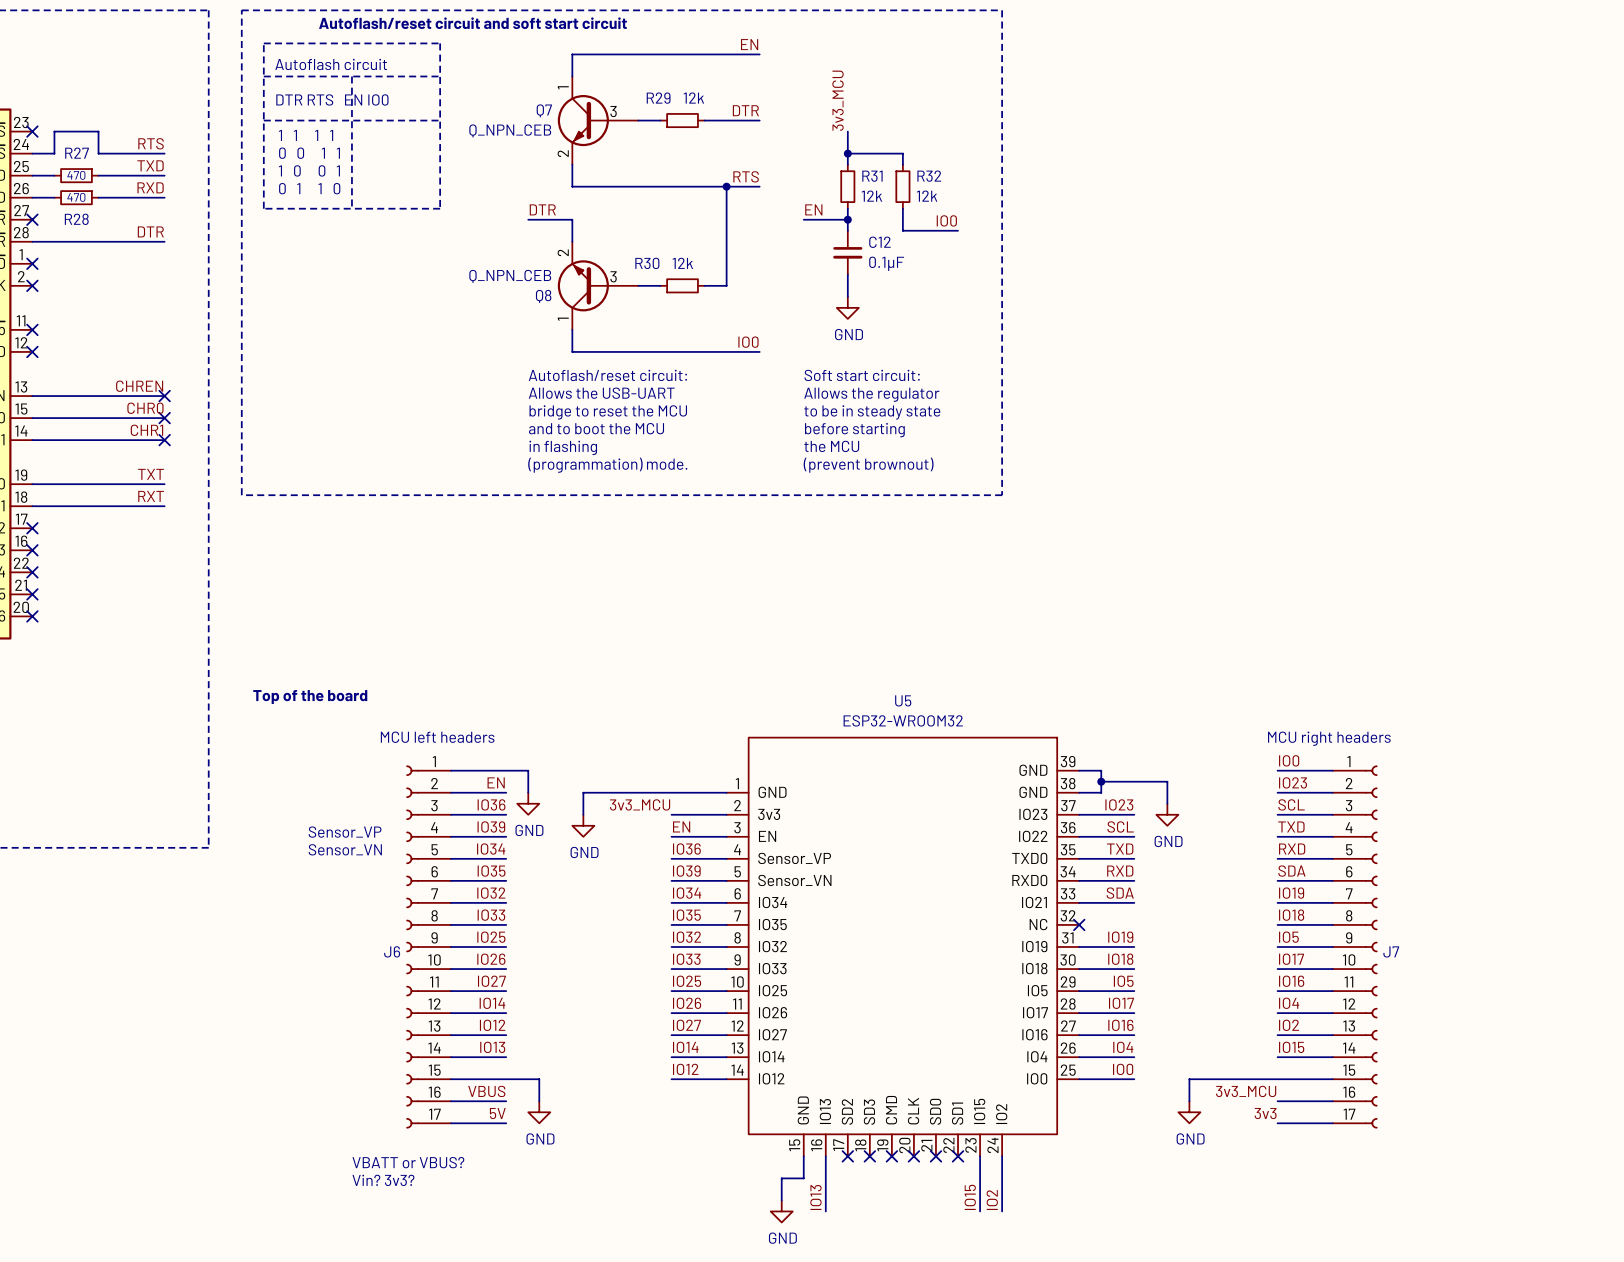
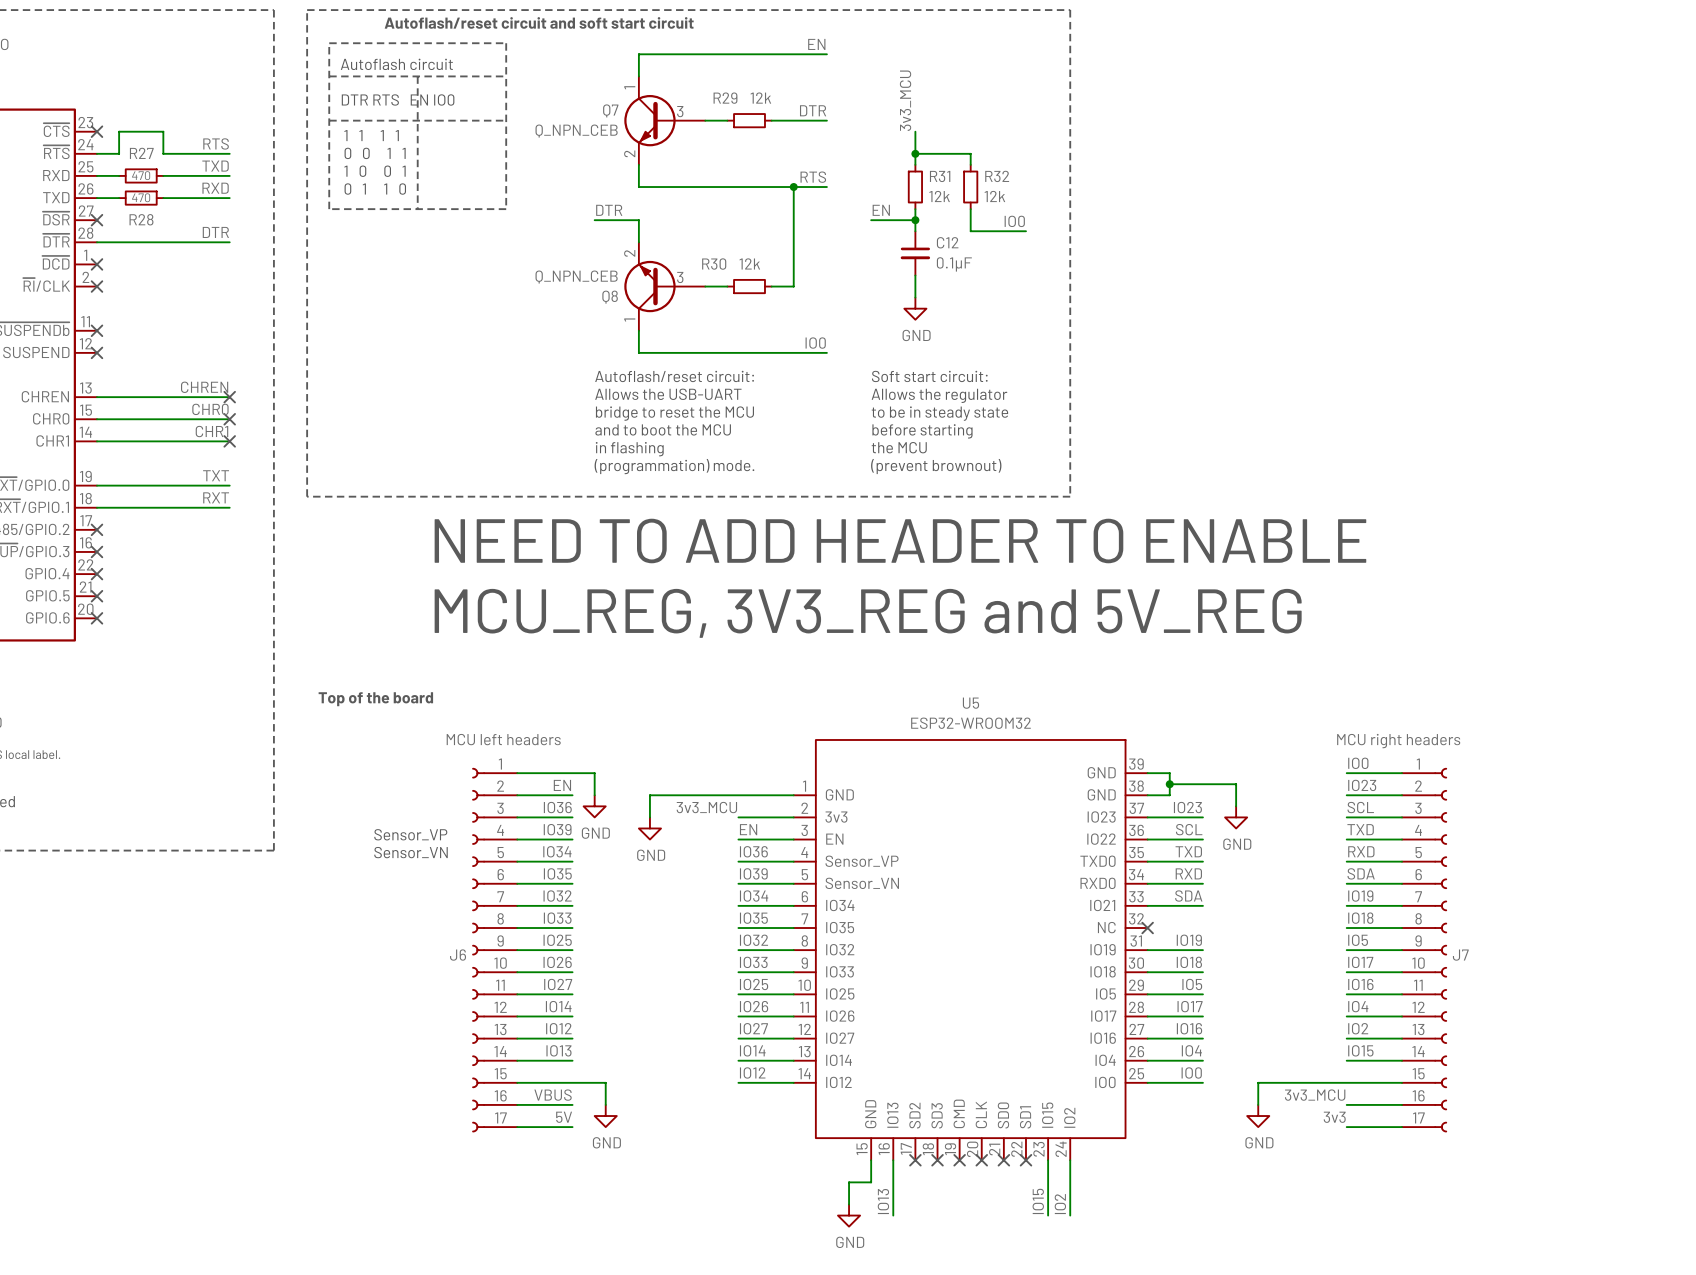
text: none -> NEED TO ADD HEADER TO ENABLE (900, 541)
text: none -> MCU_REG, 3V3_REG and 5V_REG (868, 613)
text: VBATT or VBUS? (408, 1162) -> none
text: Vin? 3v3? (383, 1180) -> none

